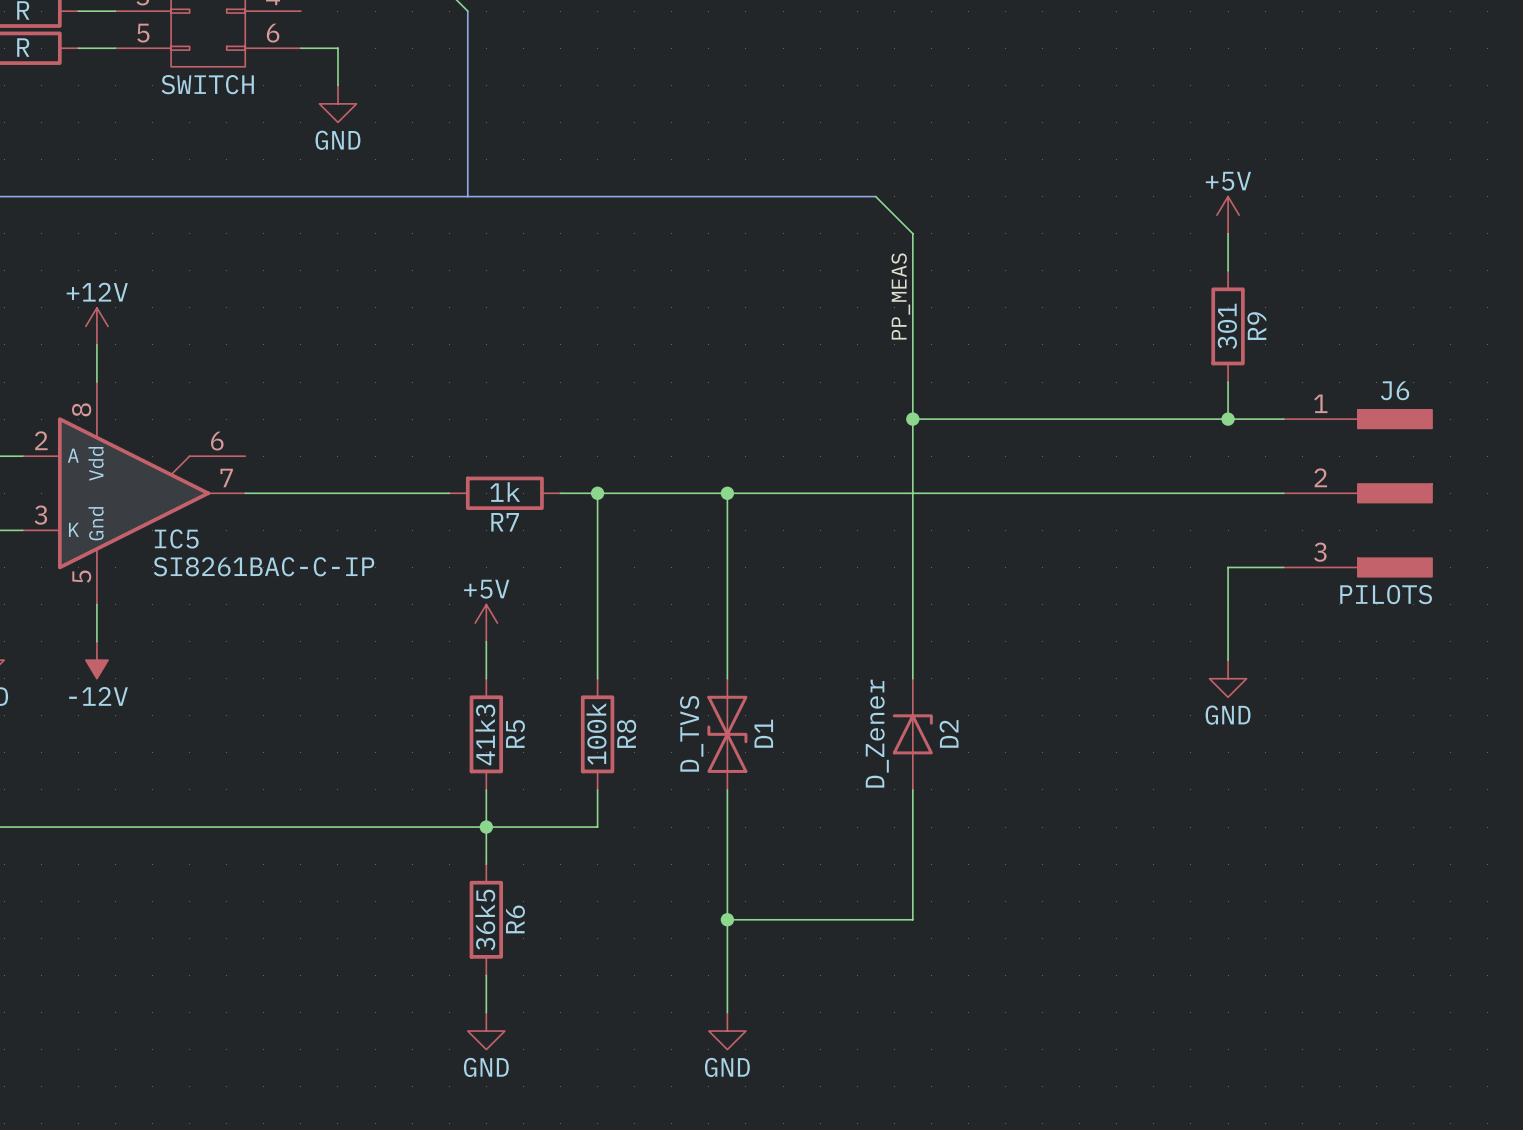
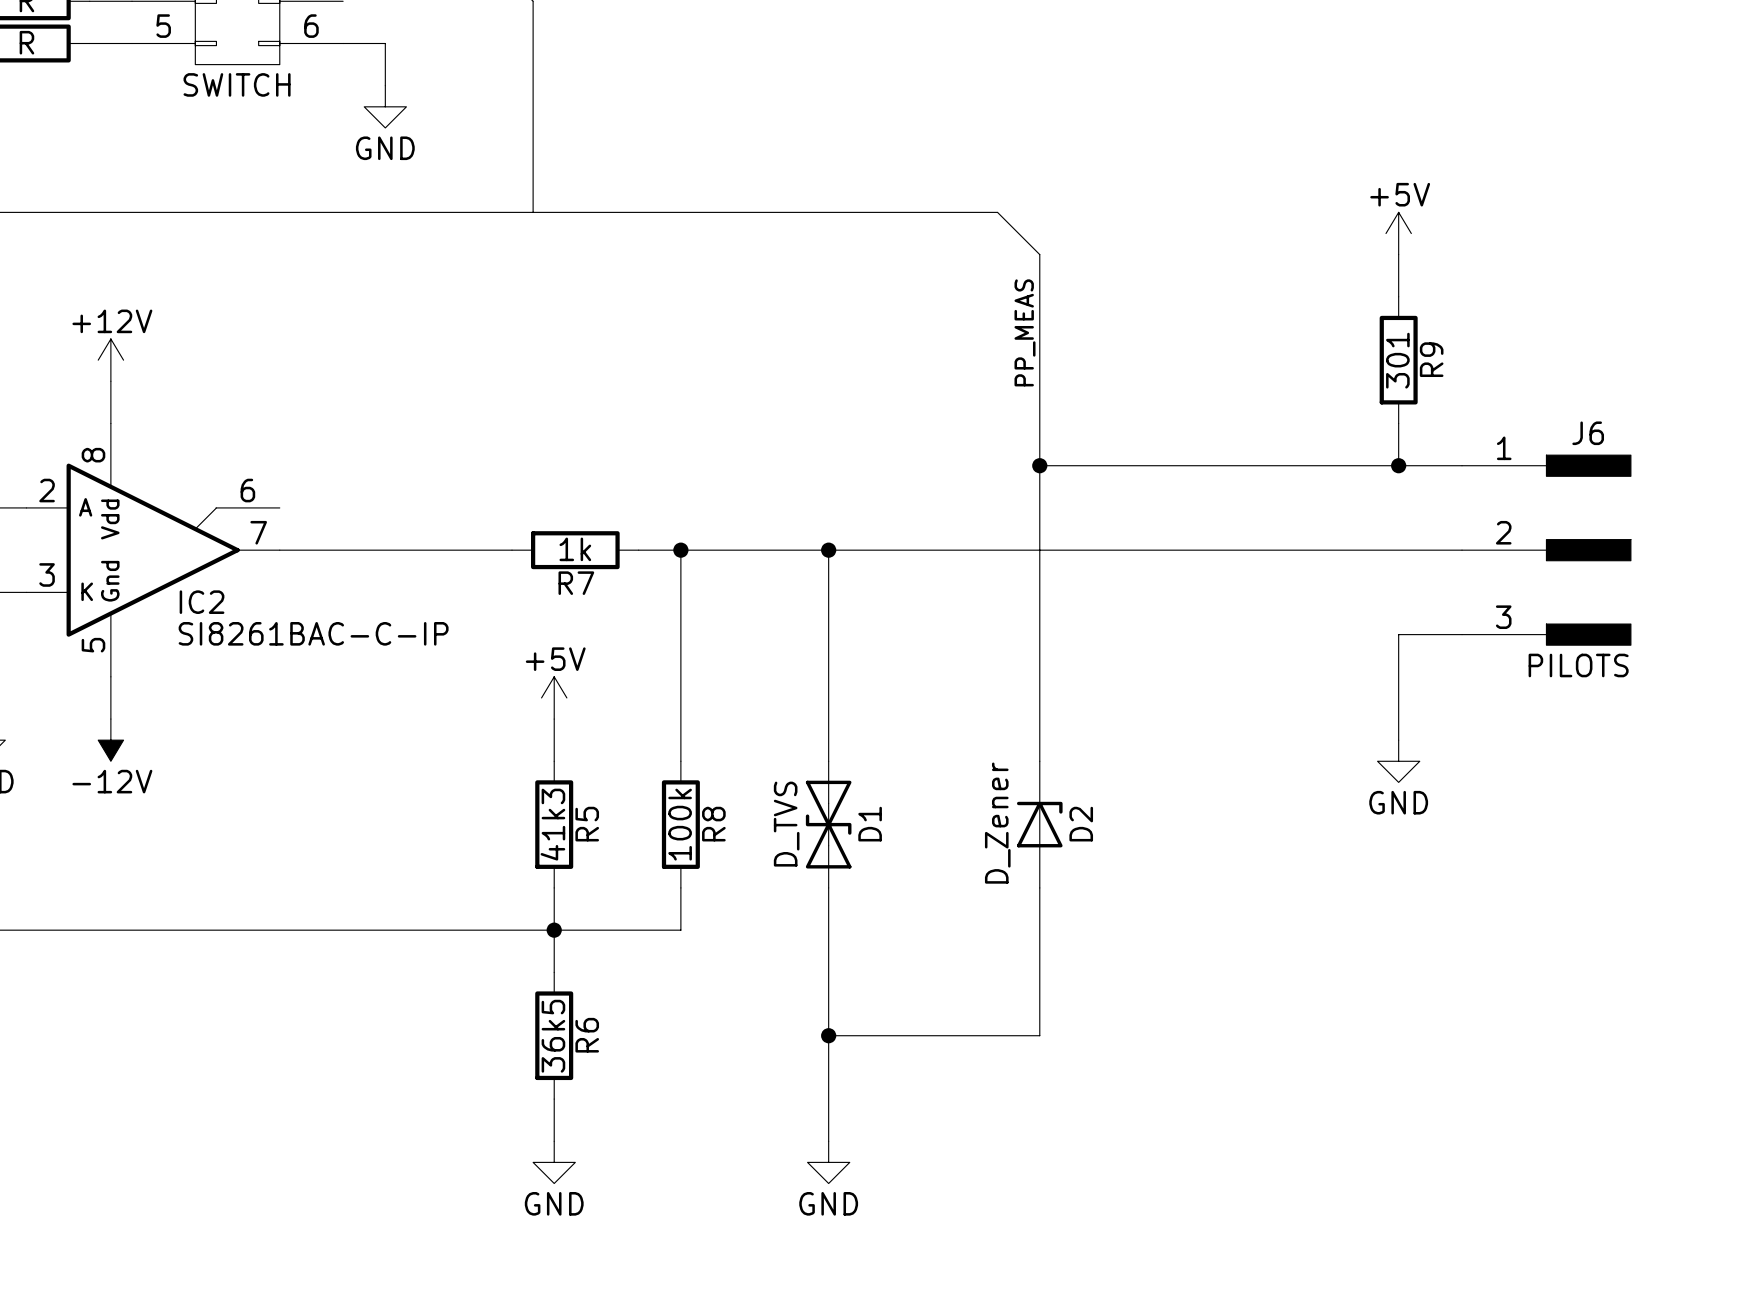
IC5 name: IC5 (176, 538) -> IC2 (202, 602)

